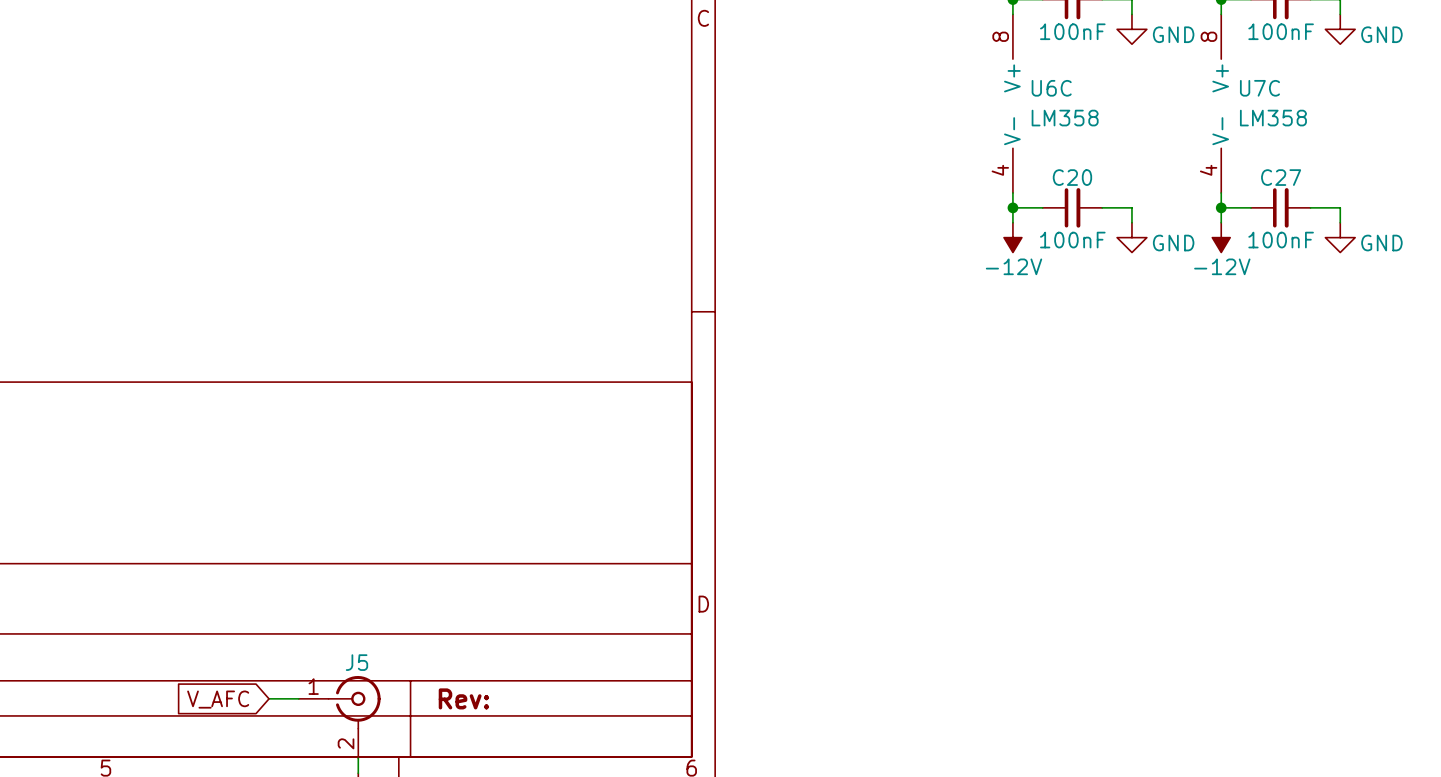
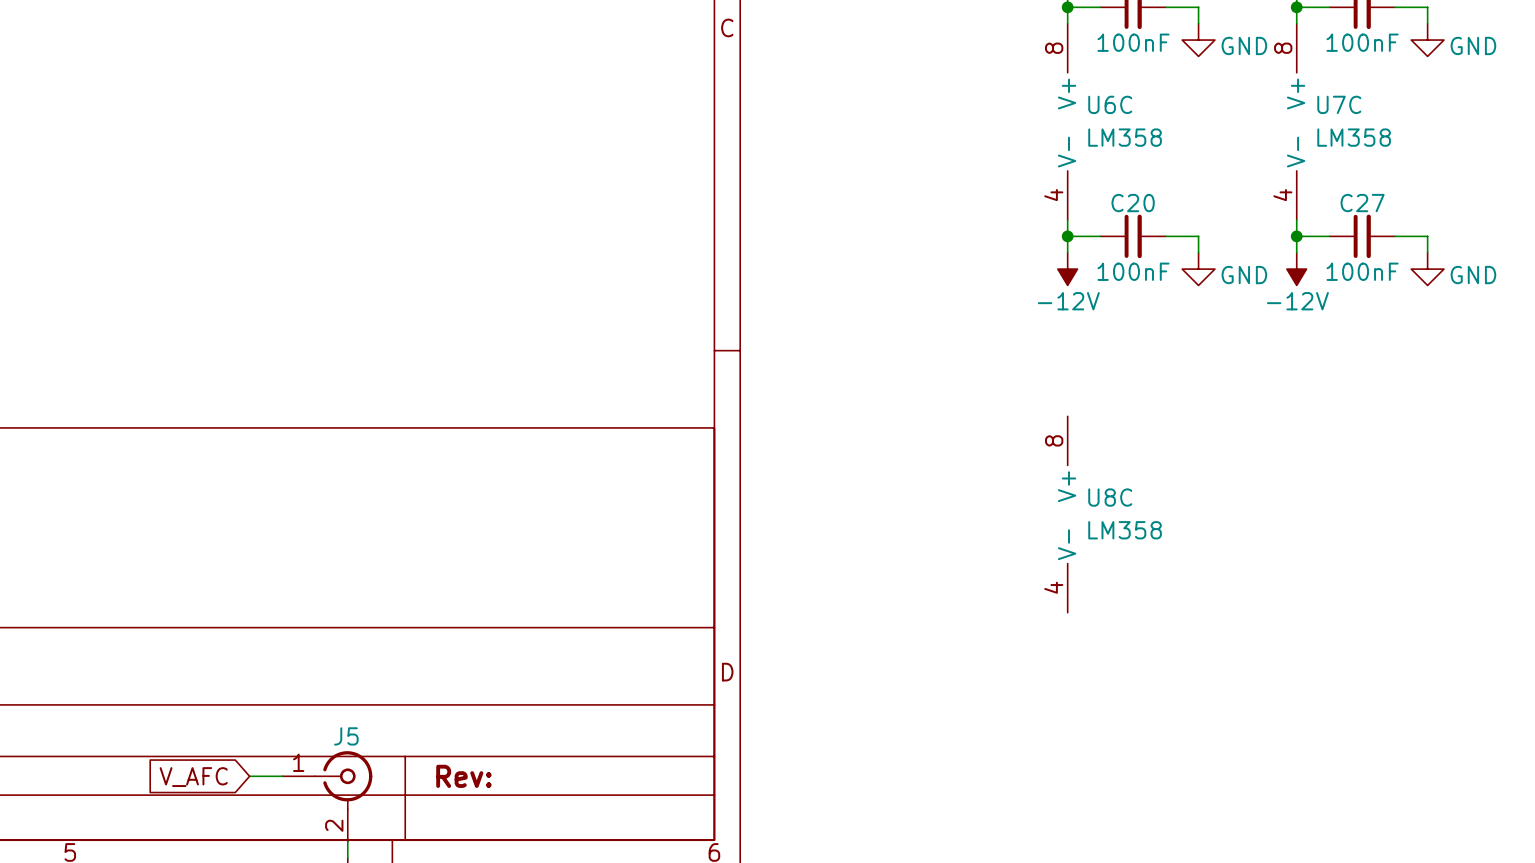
U8C: none -> LM358 (1067, 514)

